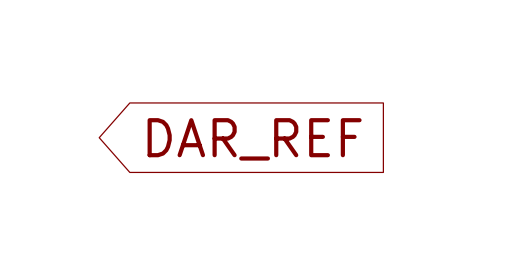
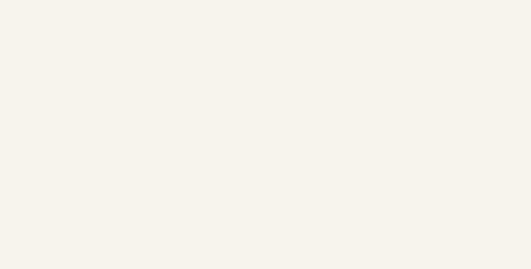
global label: DAR_REF (254, 139) -> none

